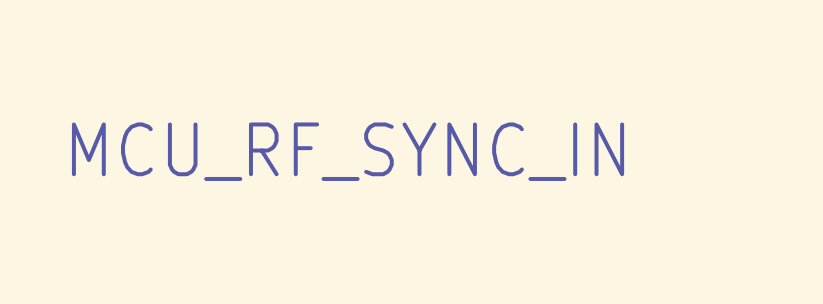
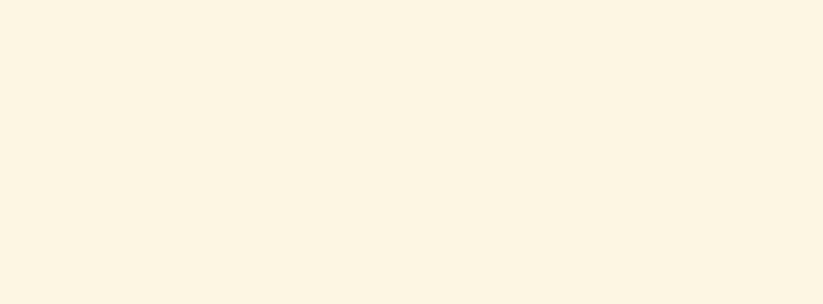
text: MCU_RF_SYNC_IN (348, 151) -> none

